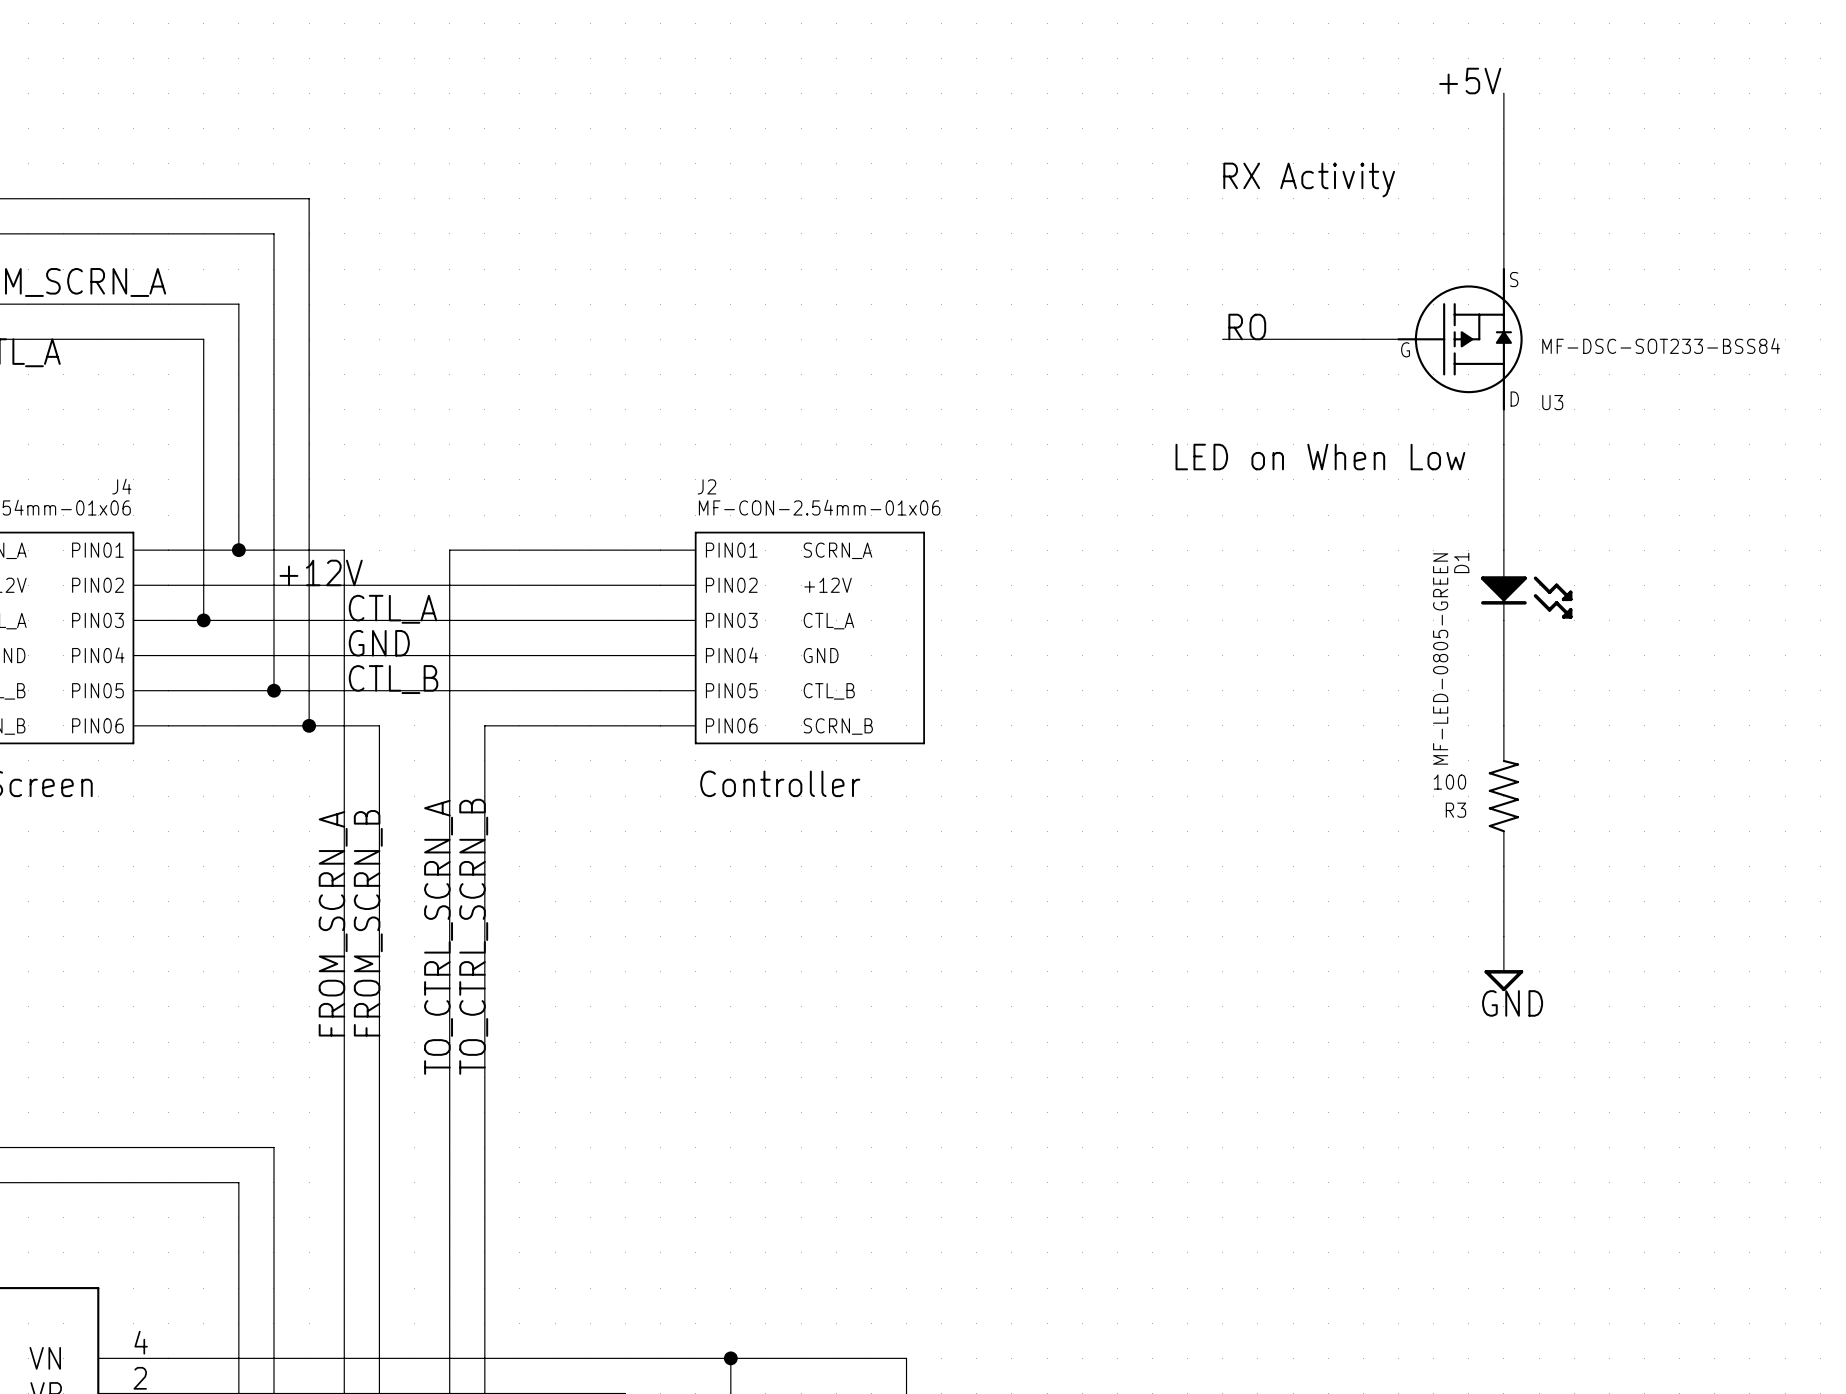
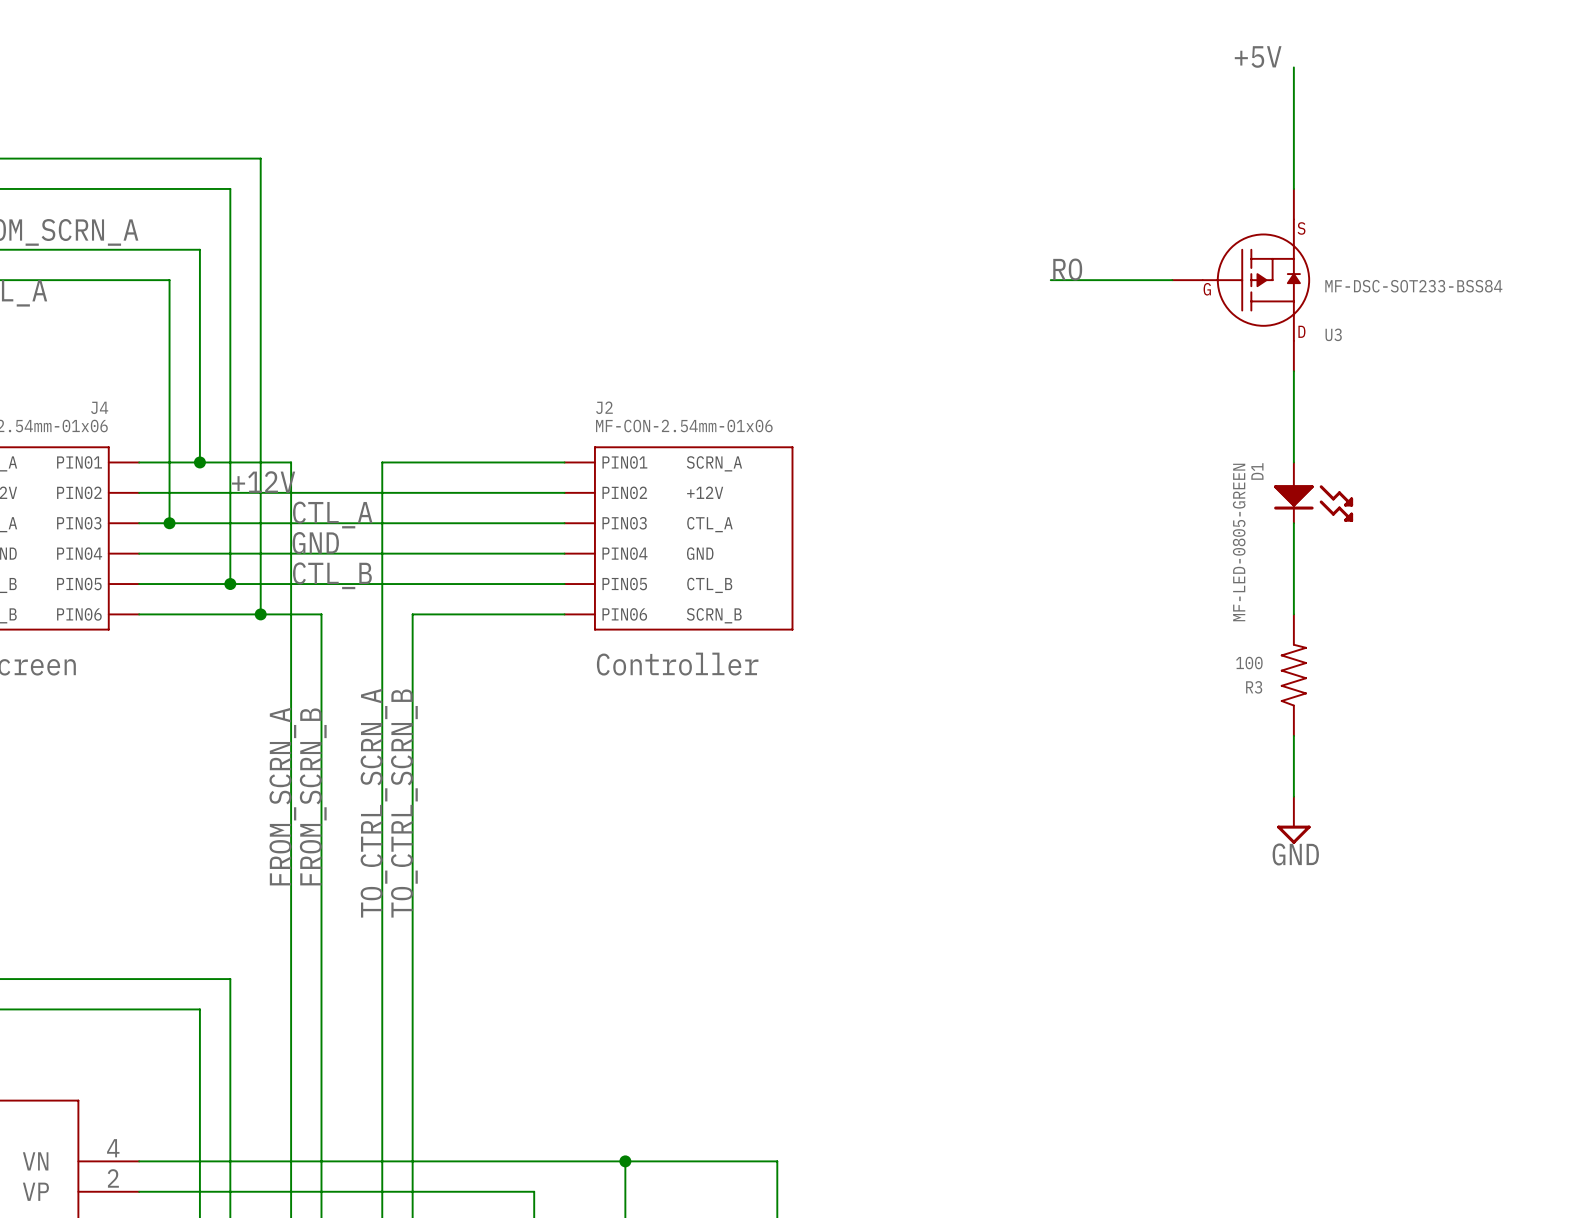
text: RX Activity (1309, 179) -> none
text: LED on When Low (1320, 457) -> none

